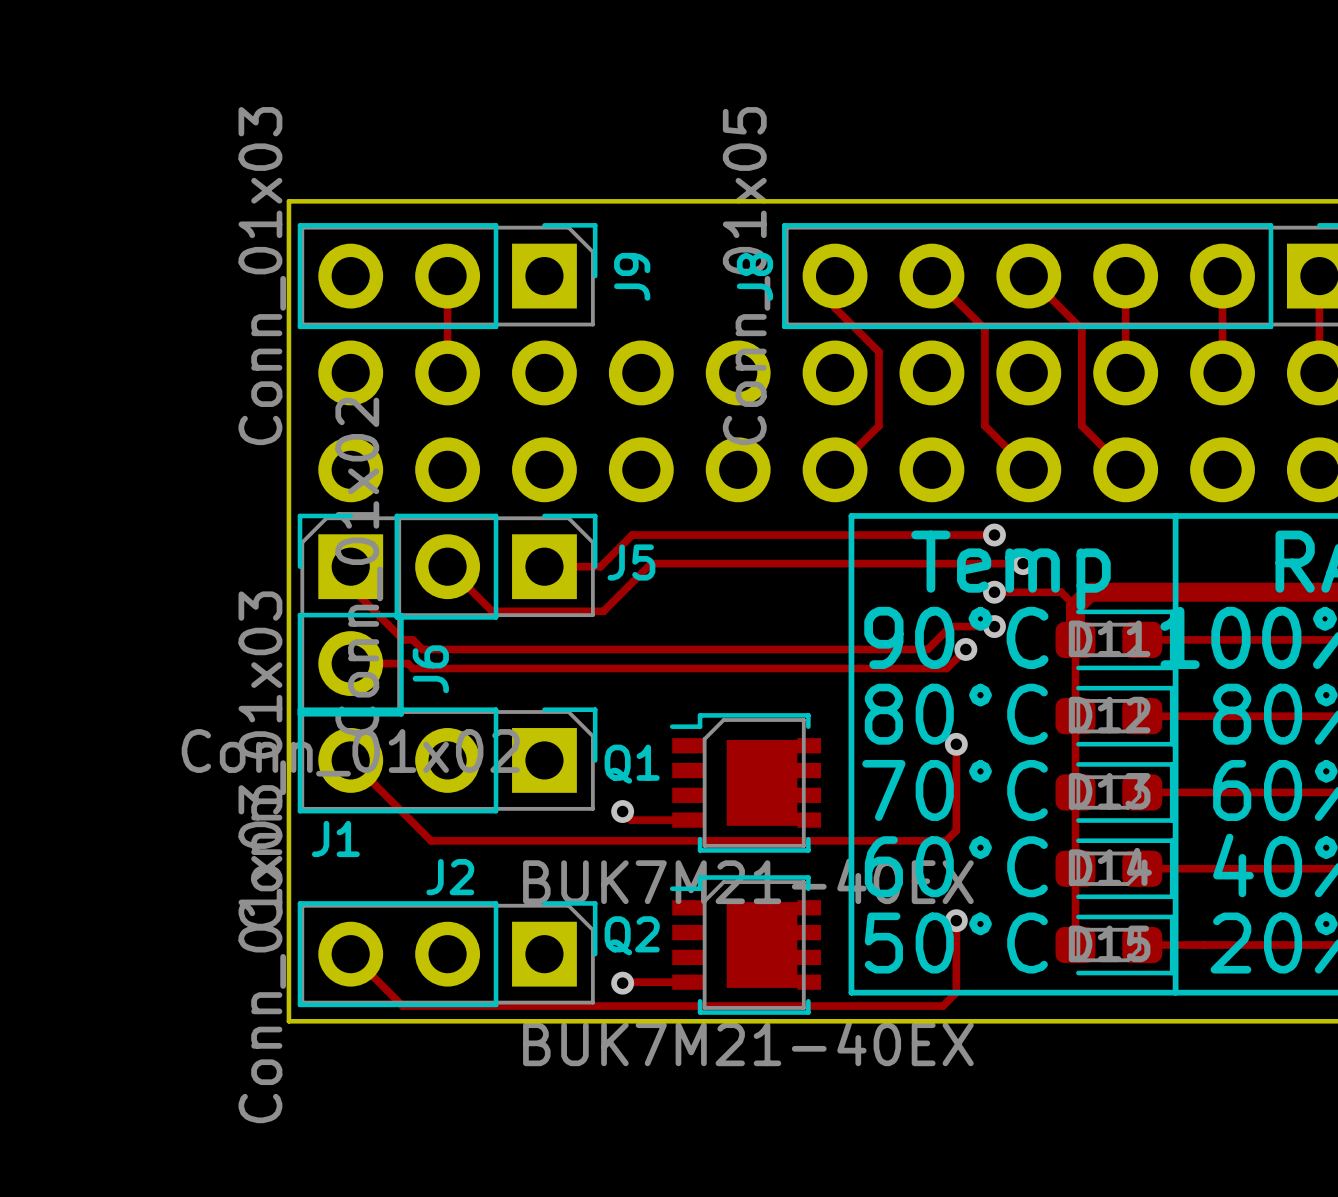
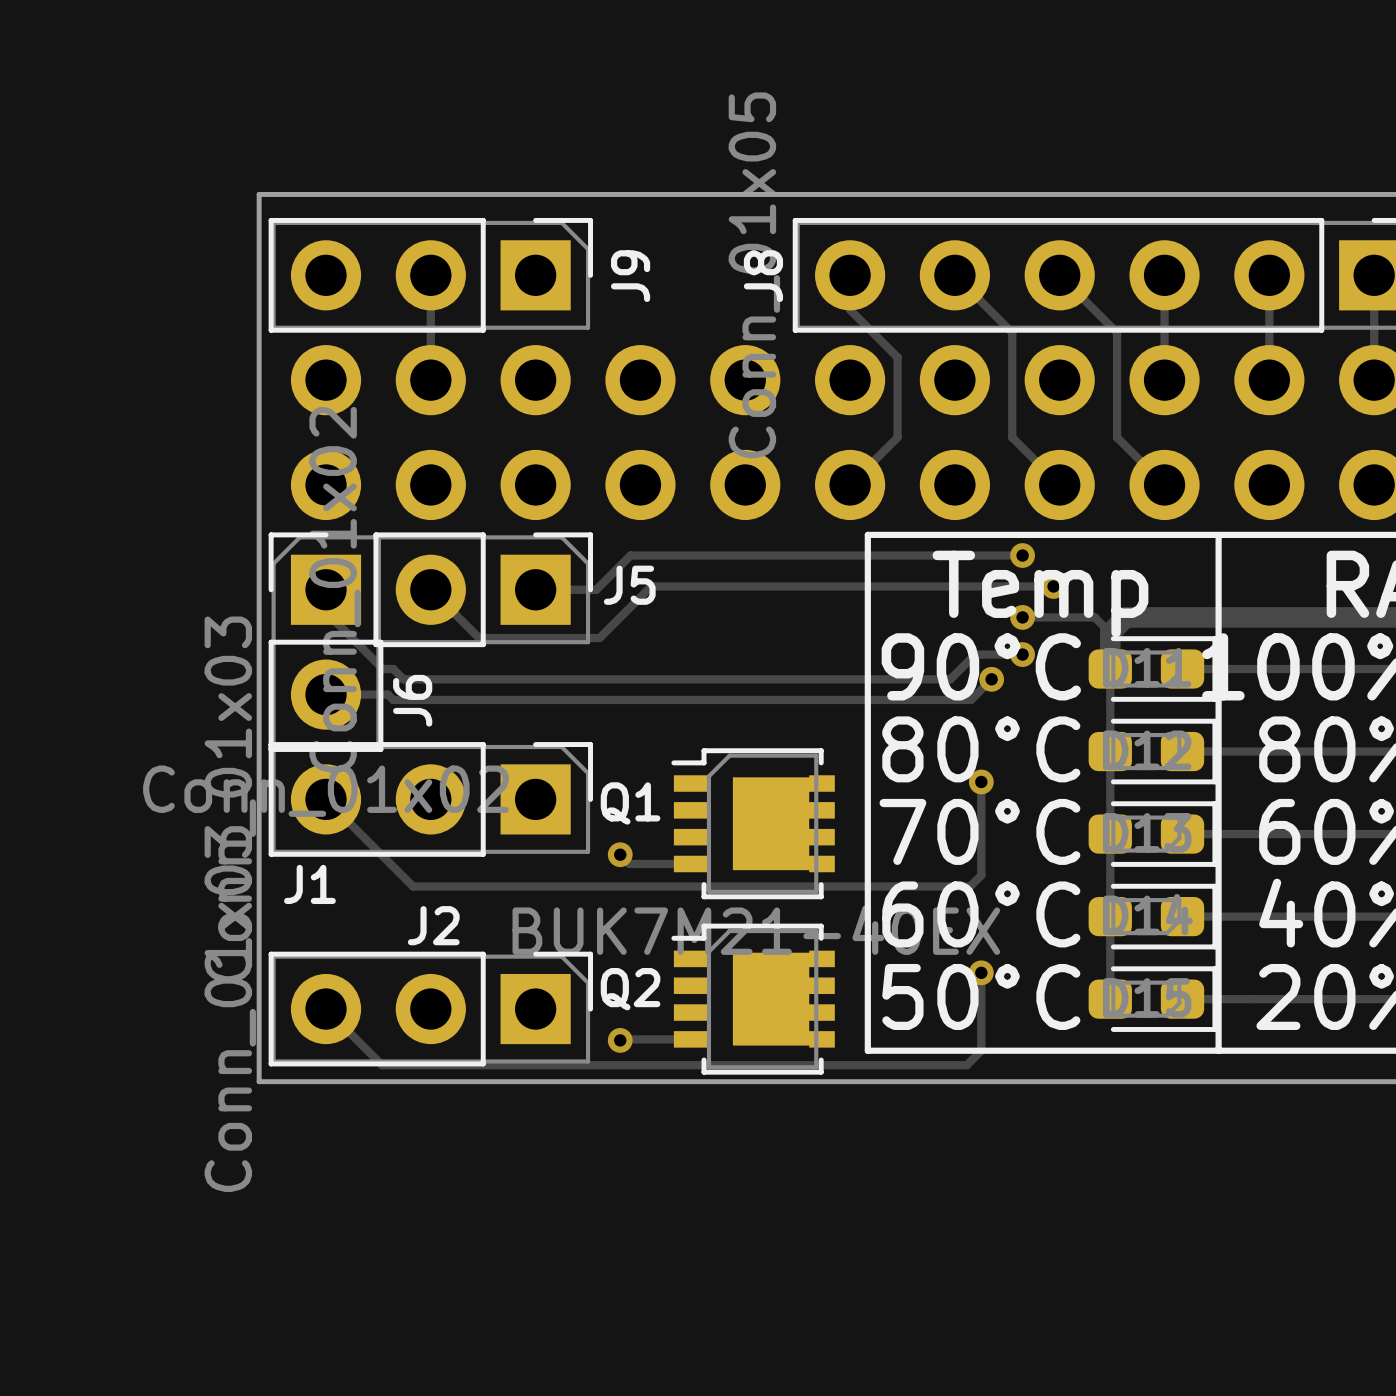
J9 value: Conn_01x03 (262, 276) -> none
Q2 value: BUK7M21-40EX (748, 1043) -> none

